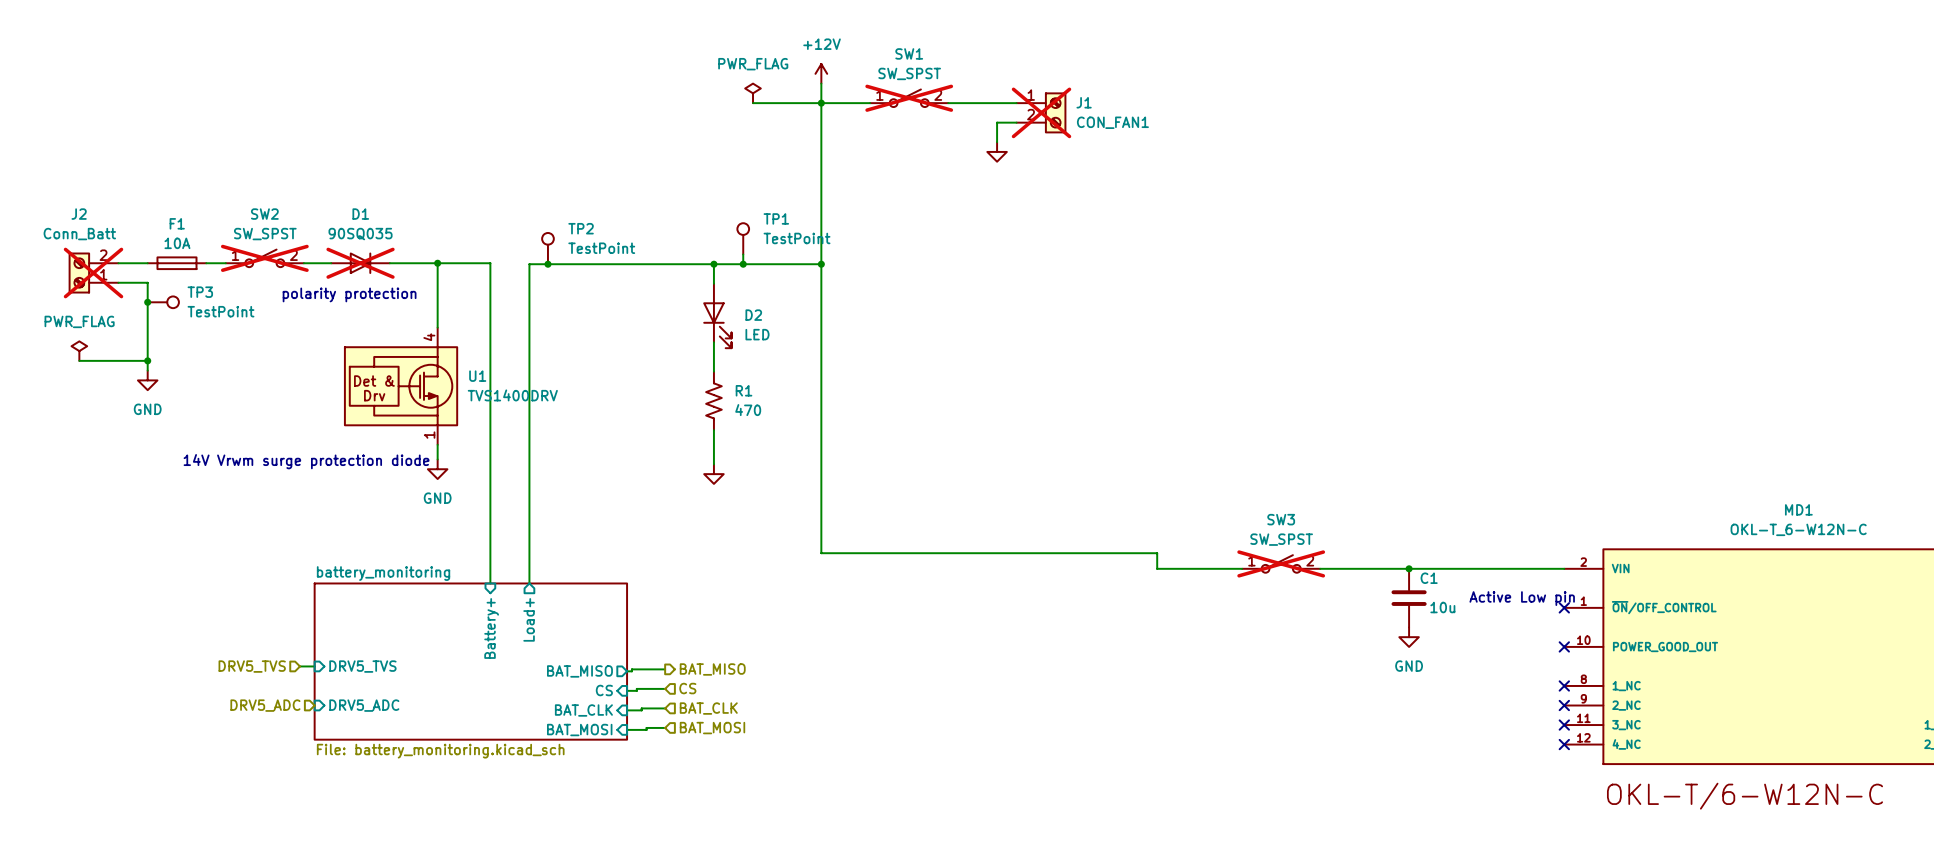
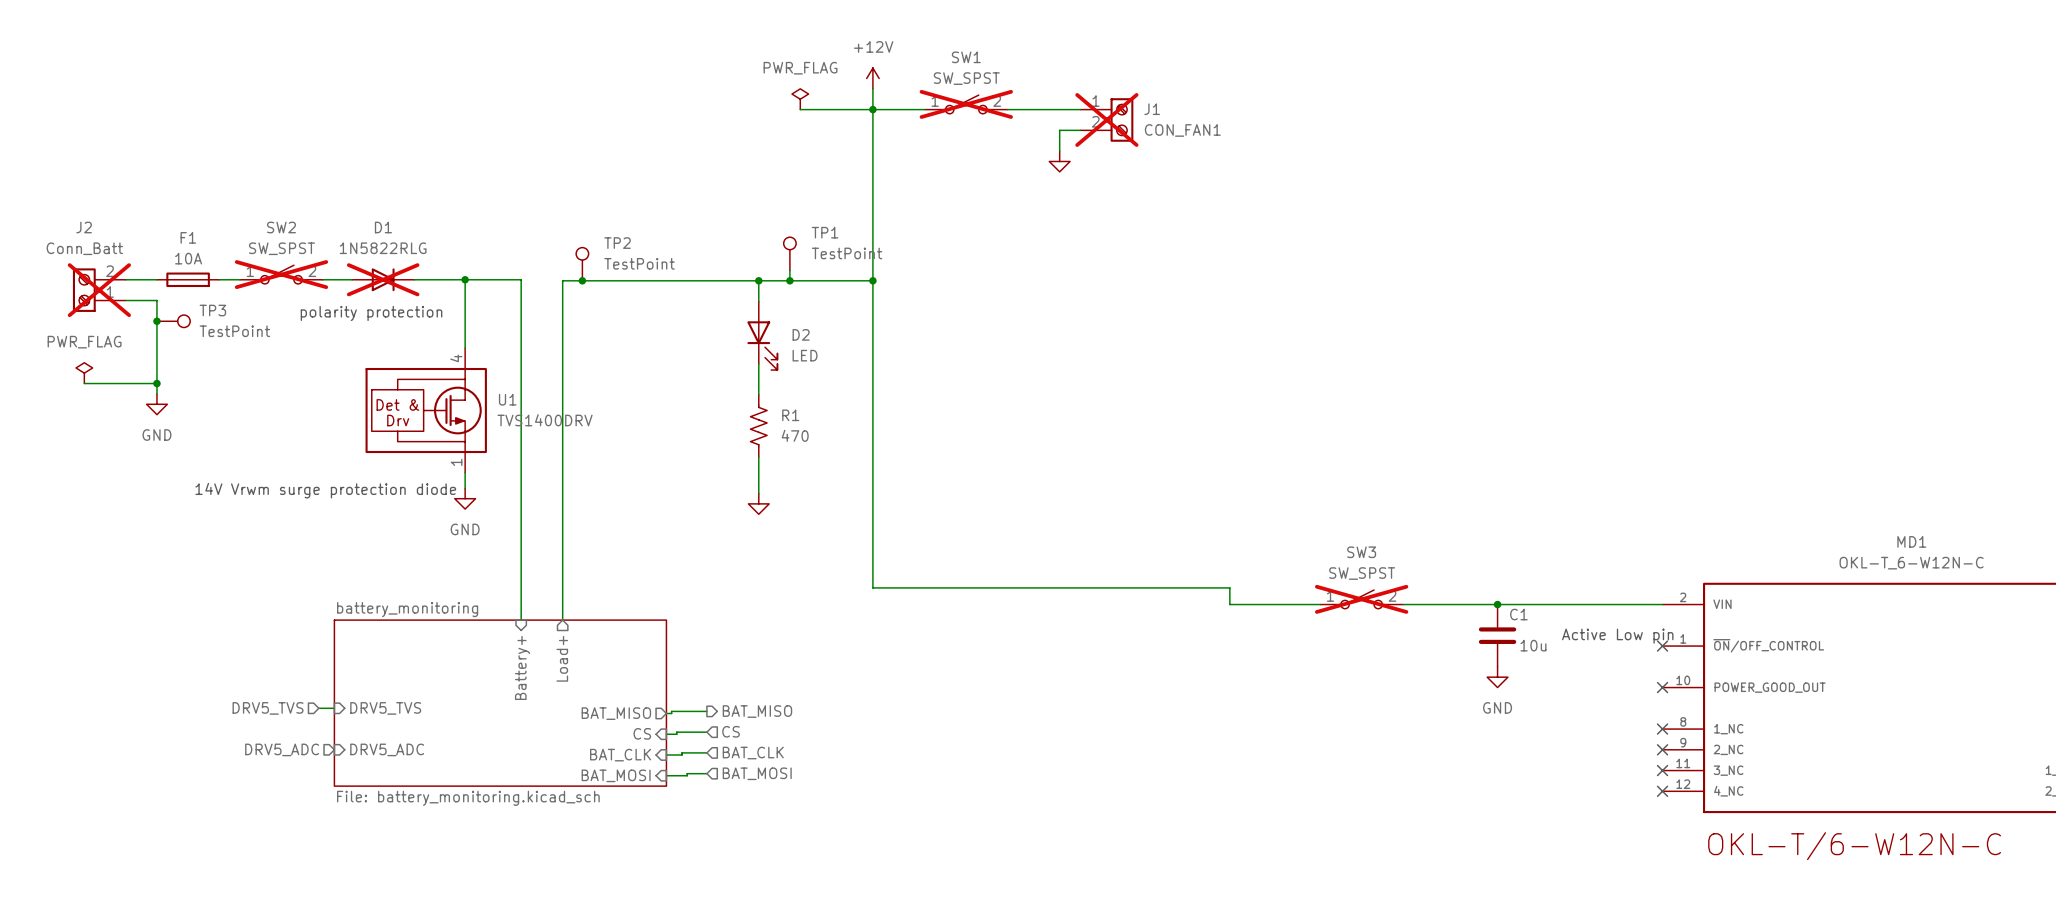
D1 value: 90SQ035 (360, 234) -> 1N5822RLG (383, 248)

